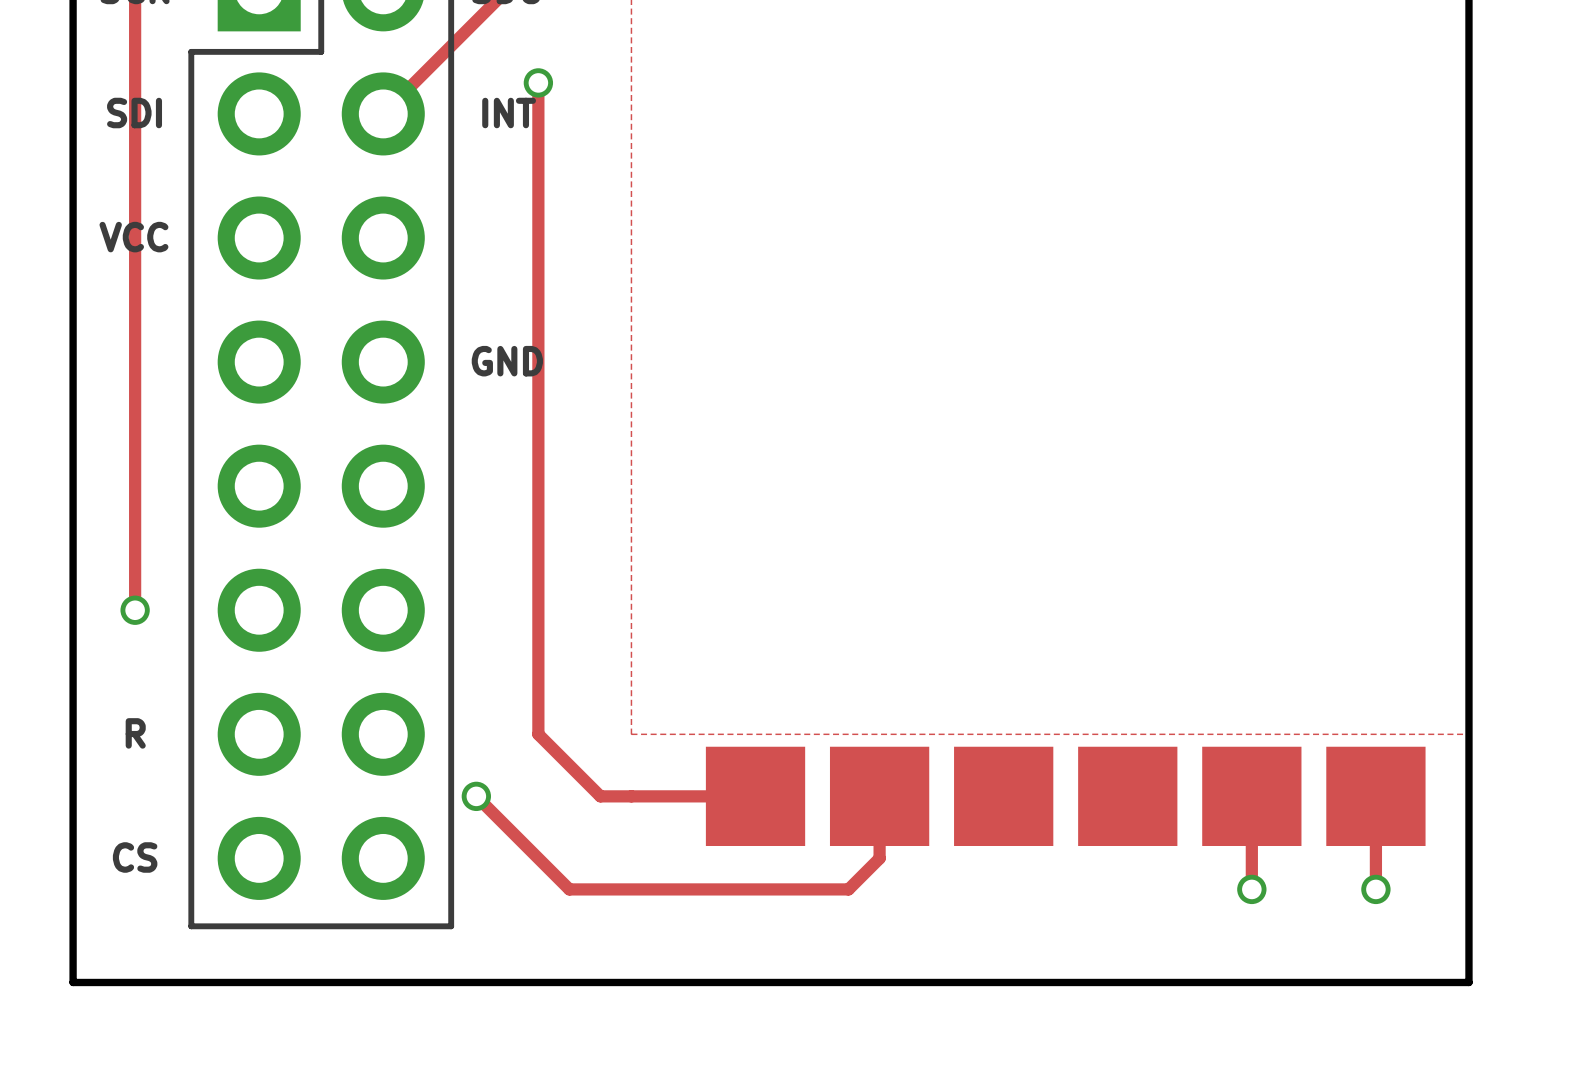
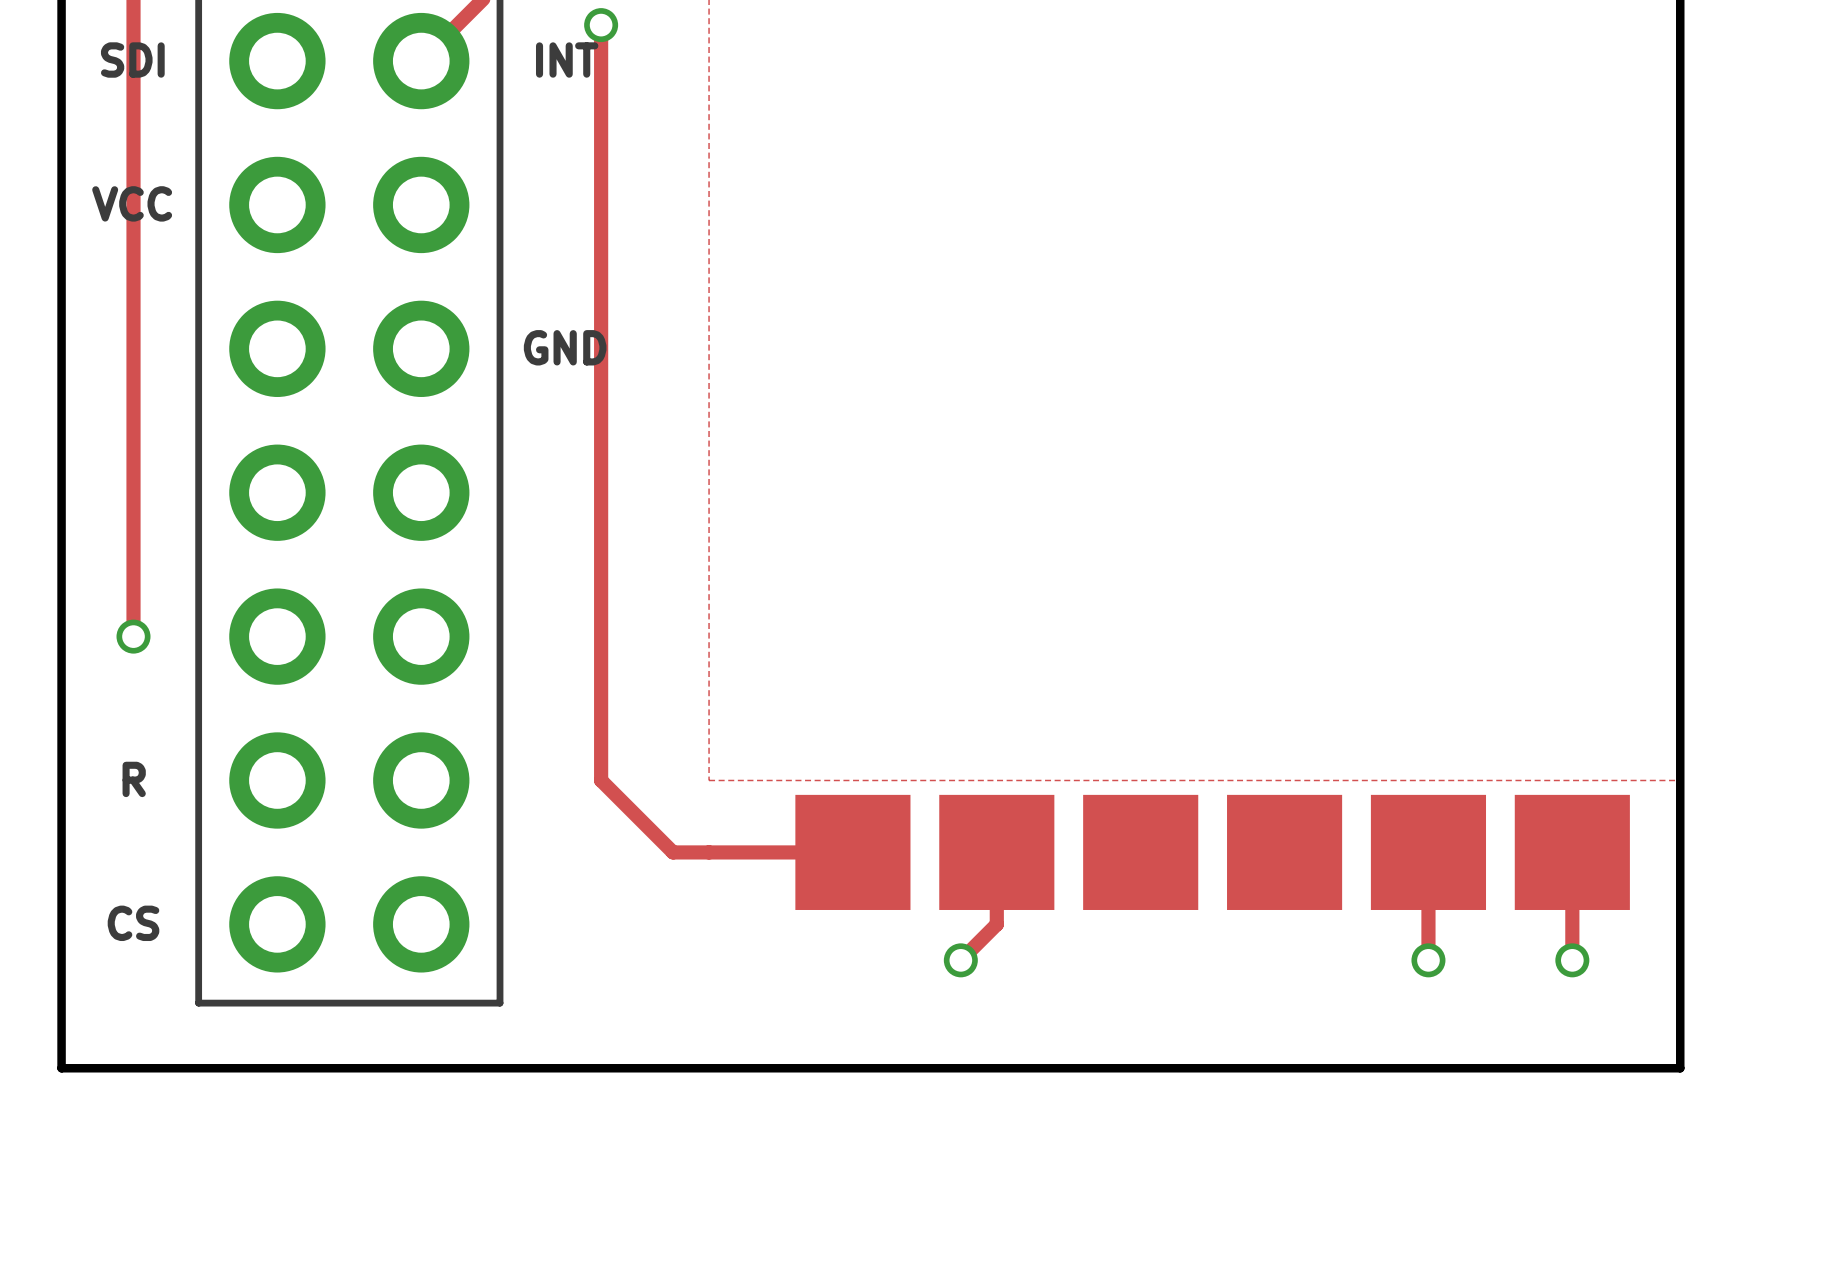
track: (476, 796) (569, 889) (848, 889) -> none
via: (476, 796) -> none
via: none -> (960, 960)

